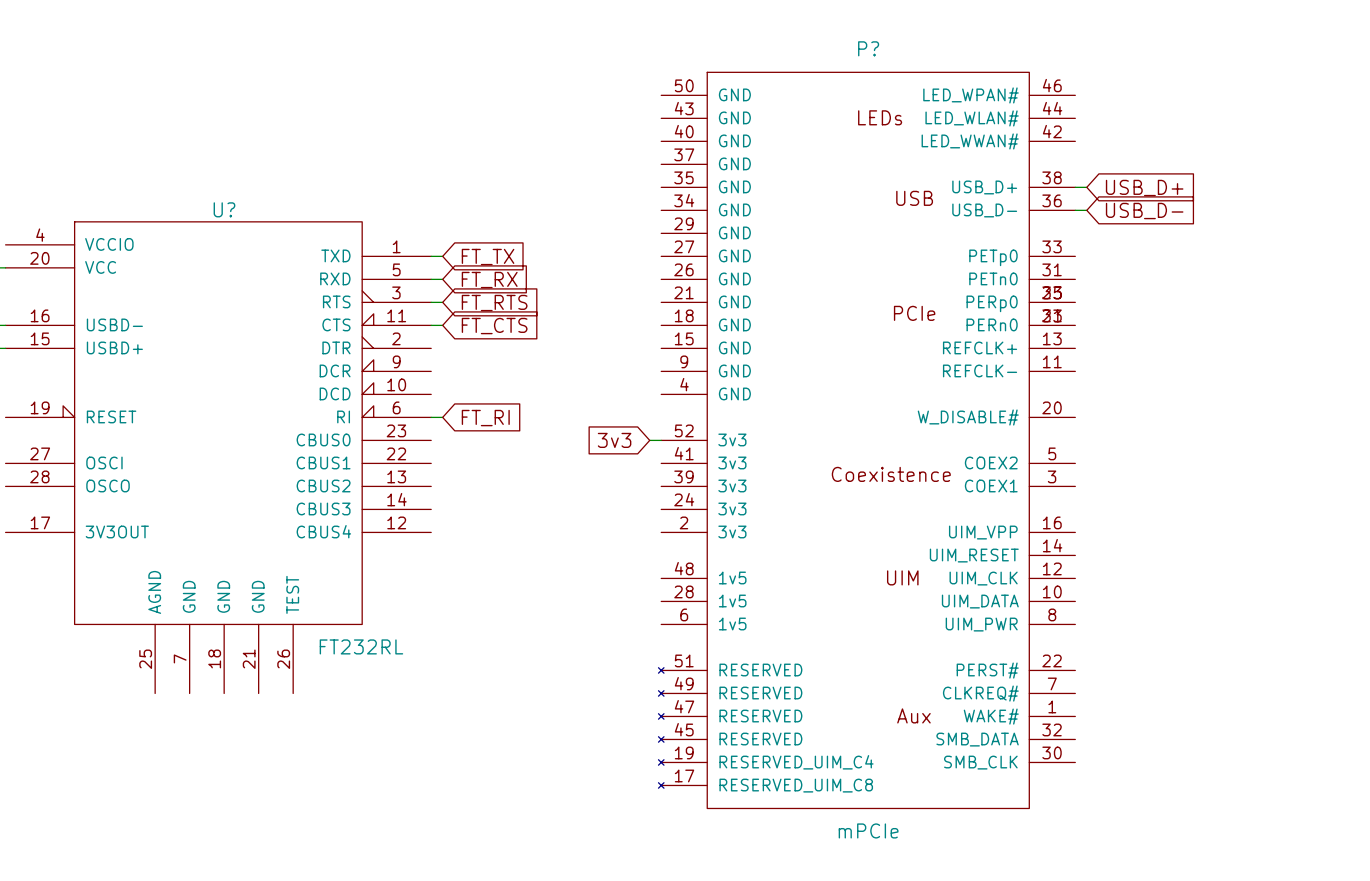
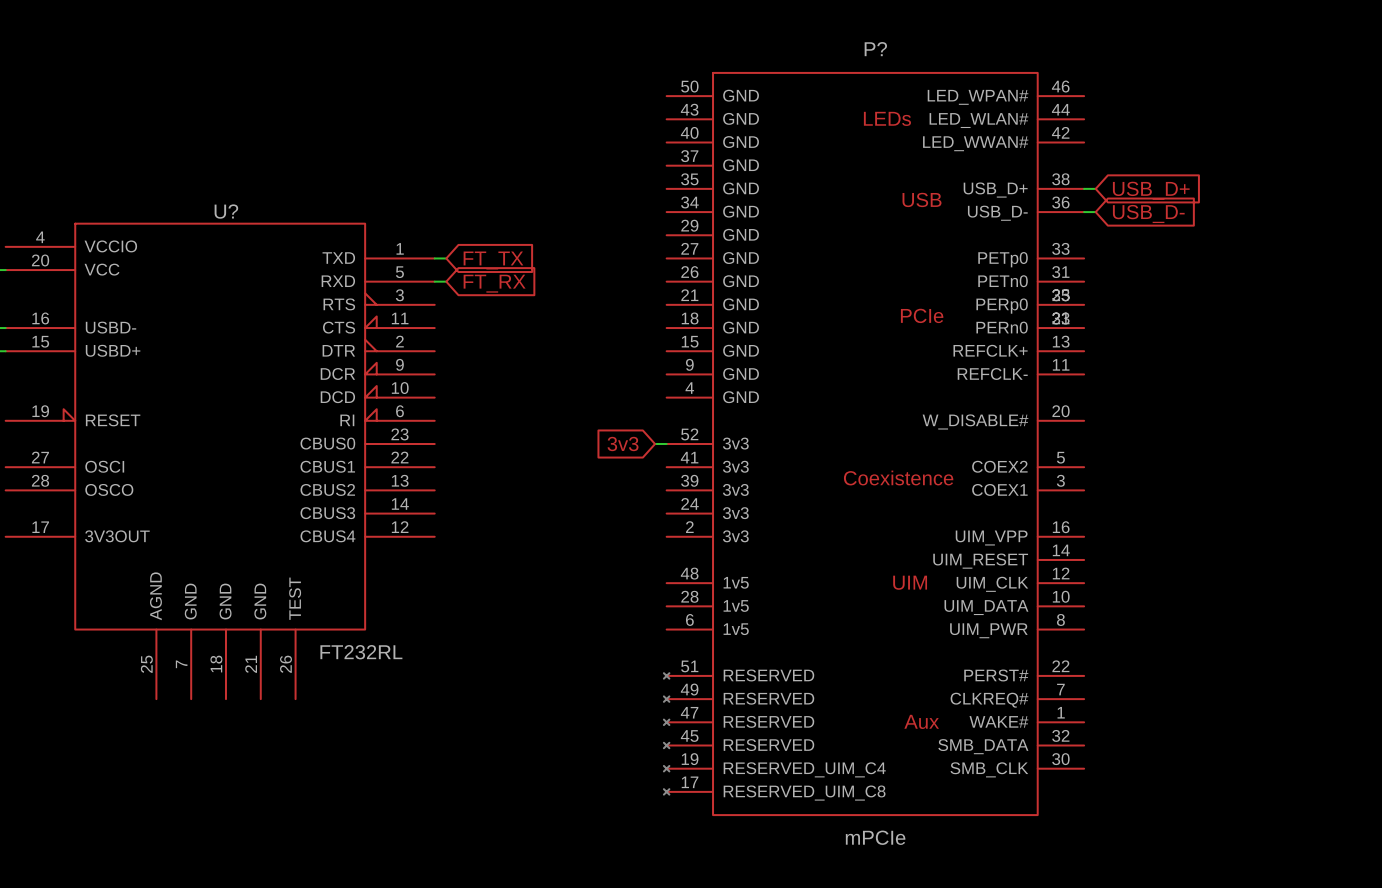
wire: (431, 302) (442, 302) -> none
global label: FT_RTS (494, 303) -> none
wire: (431, 325) (442, 325) -> none
global label: FT_CTS (494, 326) -> none
wire: (431, 417) (442, 417) -> none
global label: FT_RI (485, 418) -> none

